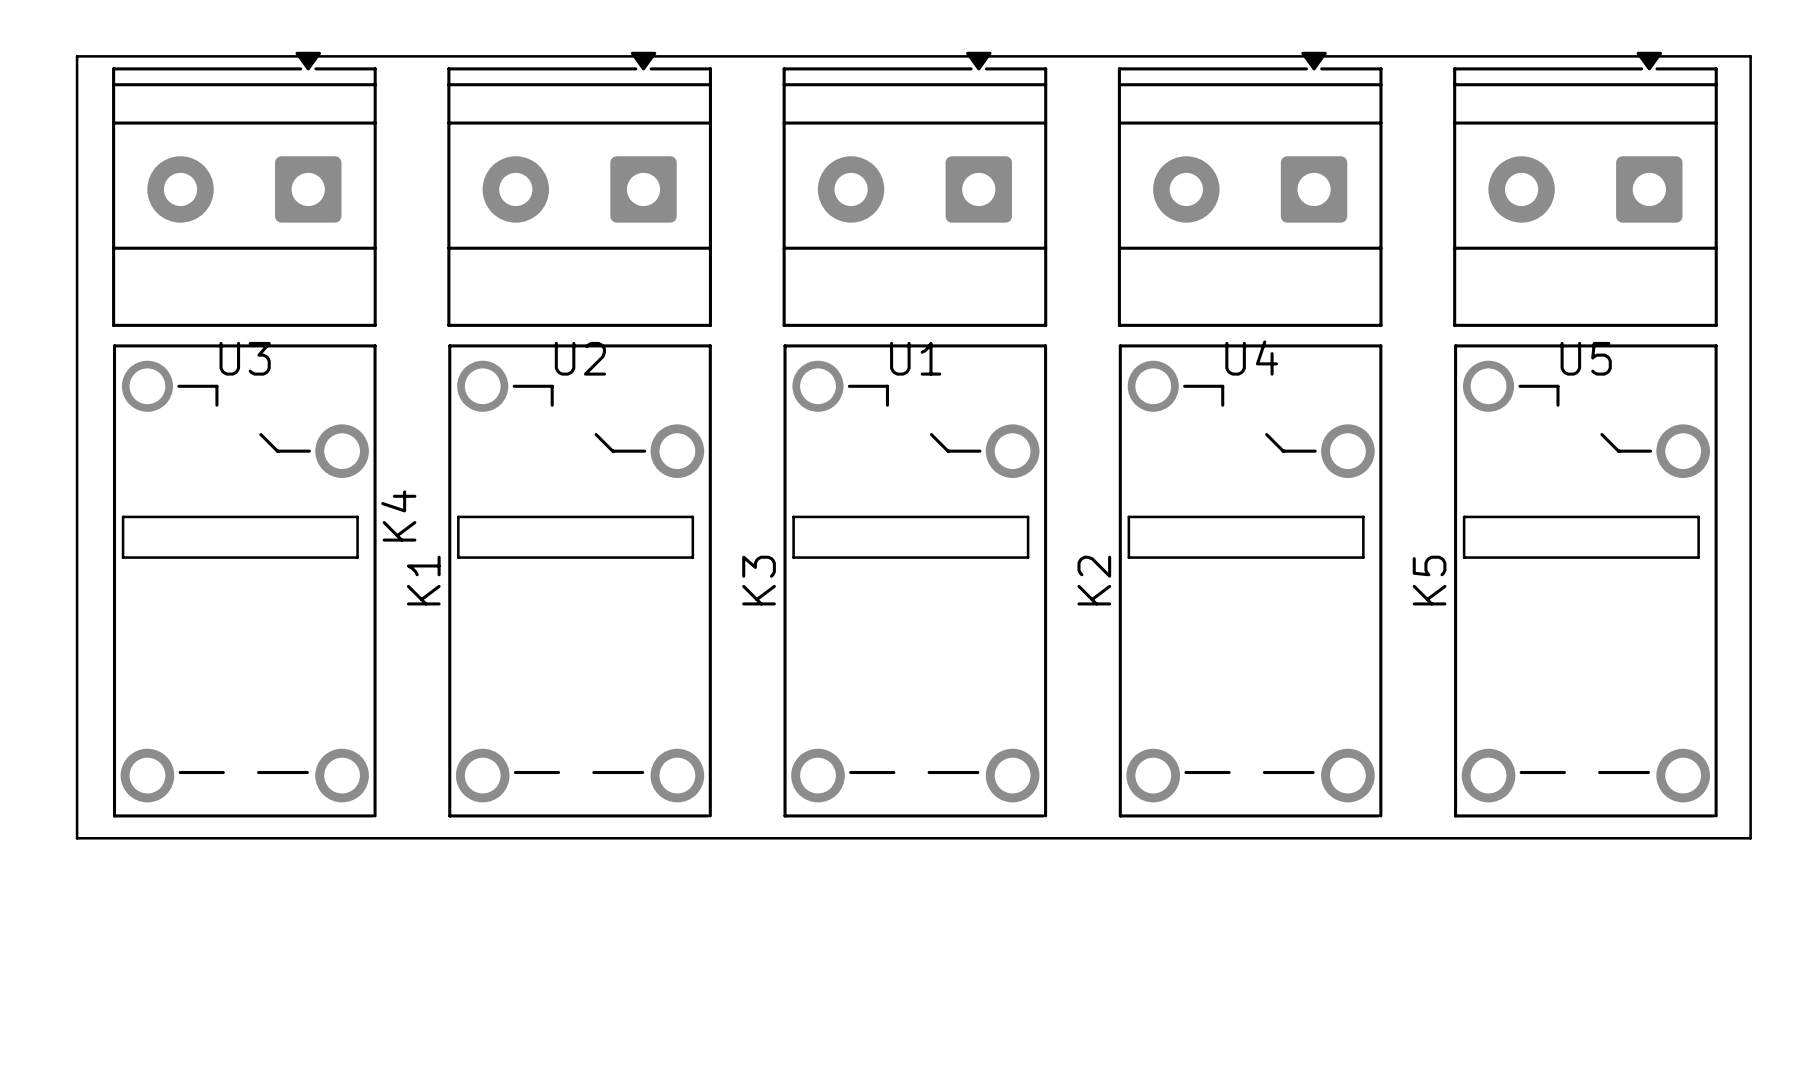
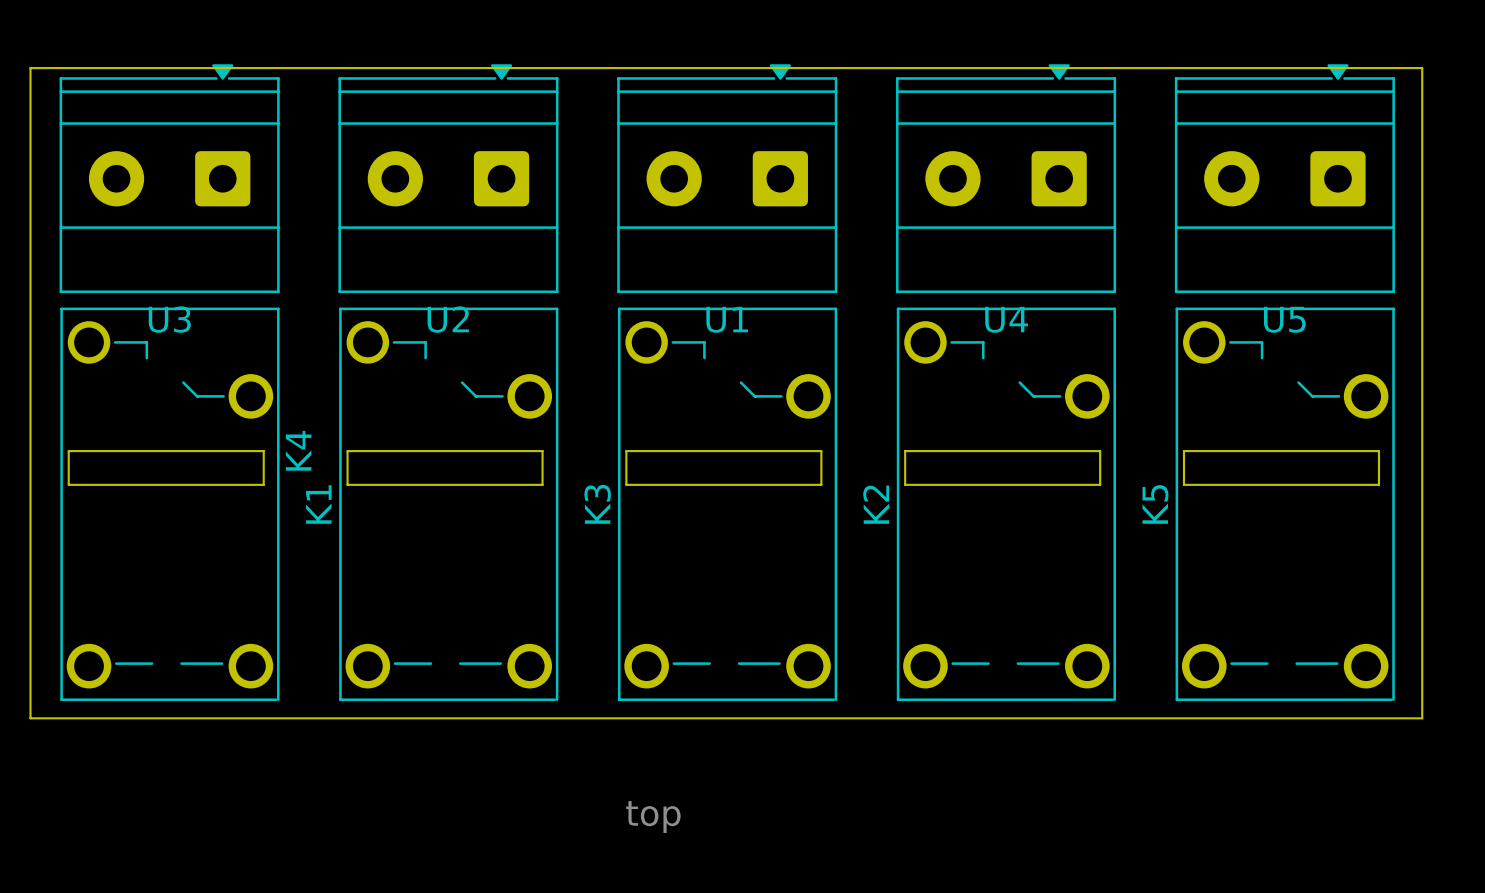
text: none -> top (653, 817)

